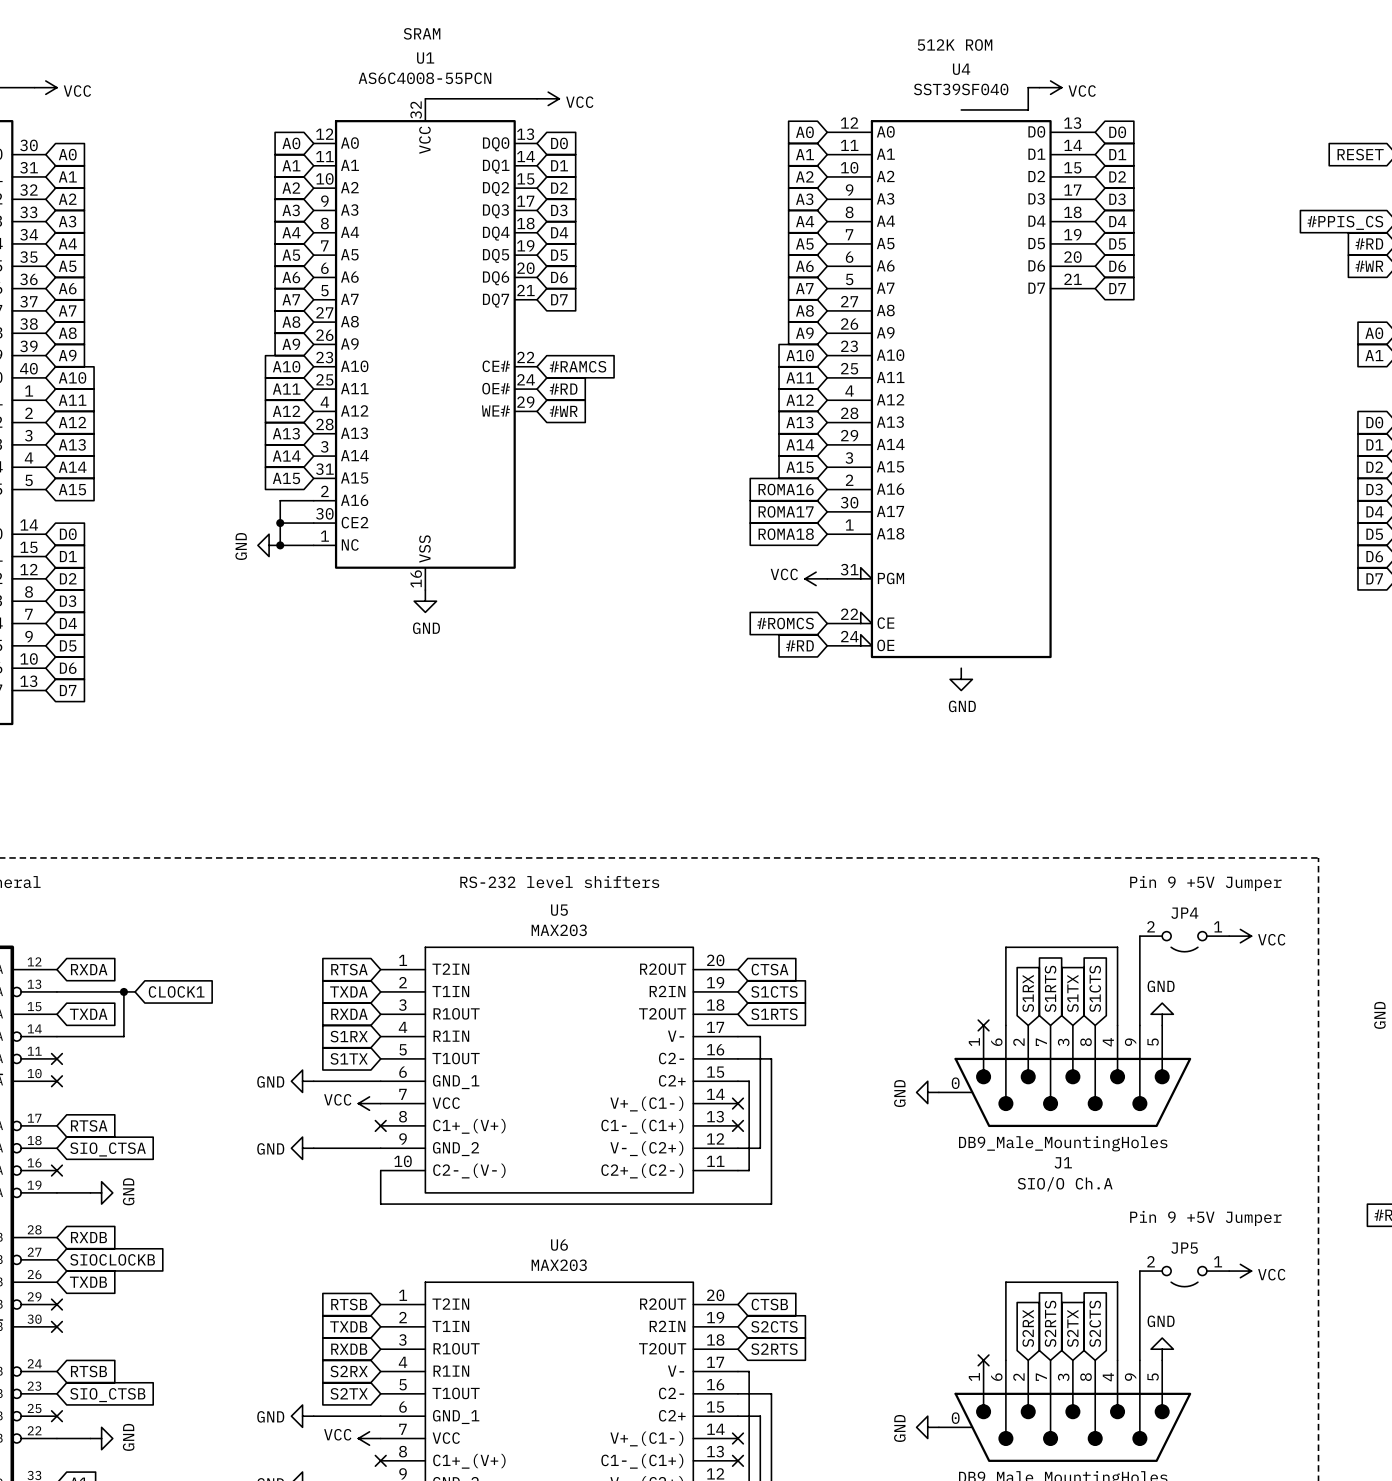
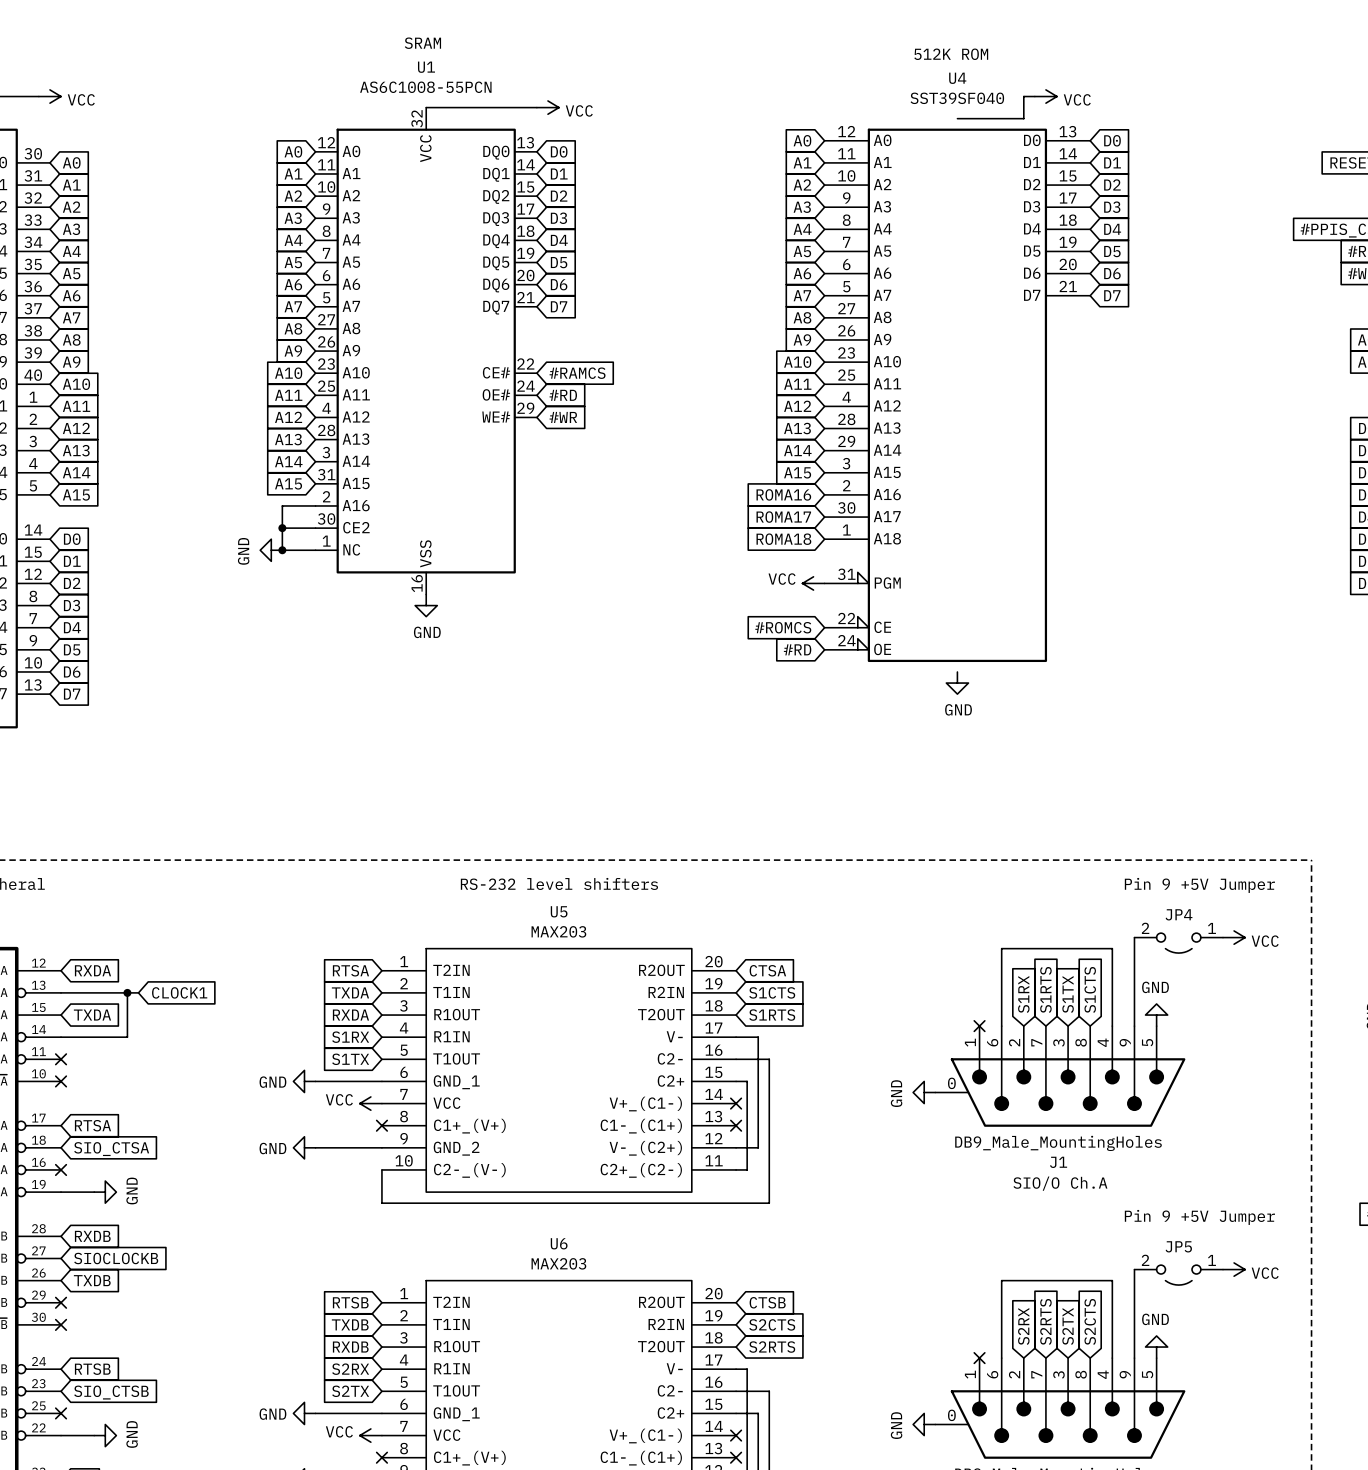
U1 value: AS6C4008-55PCN (424, 78) -> AS6C1008-55PCN (425, 87)

